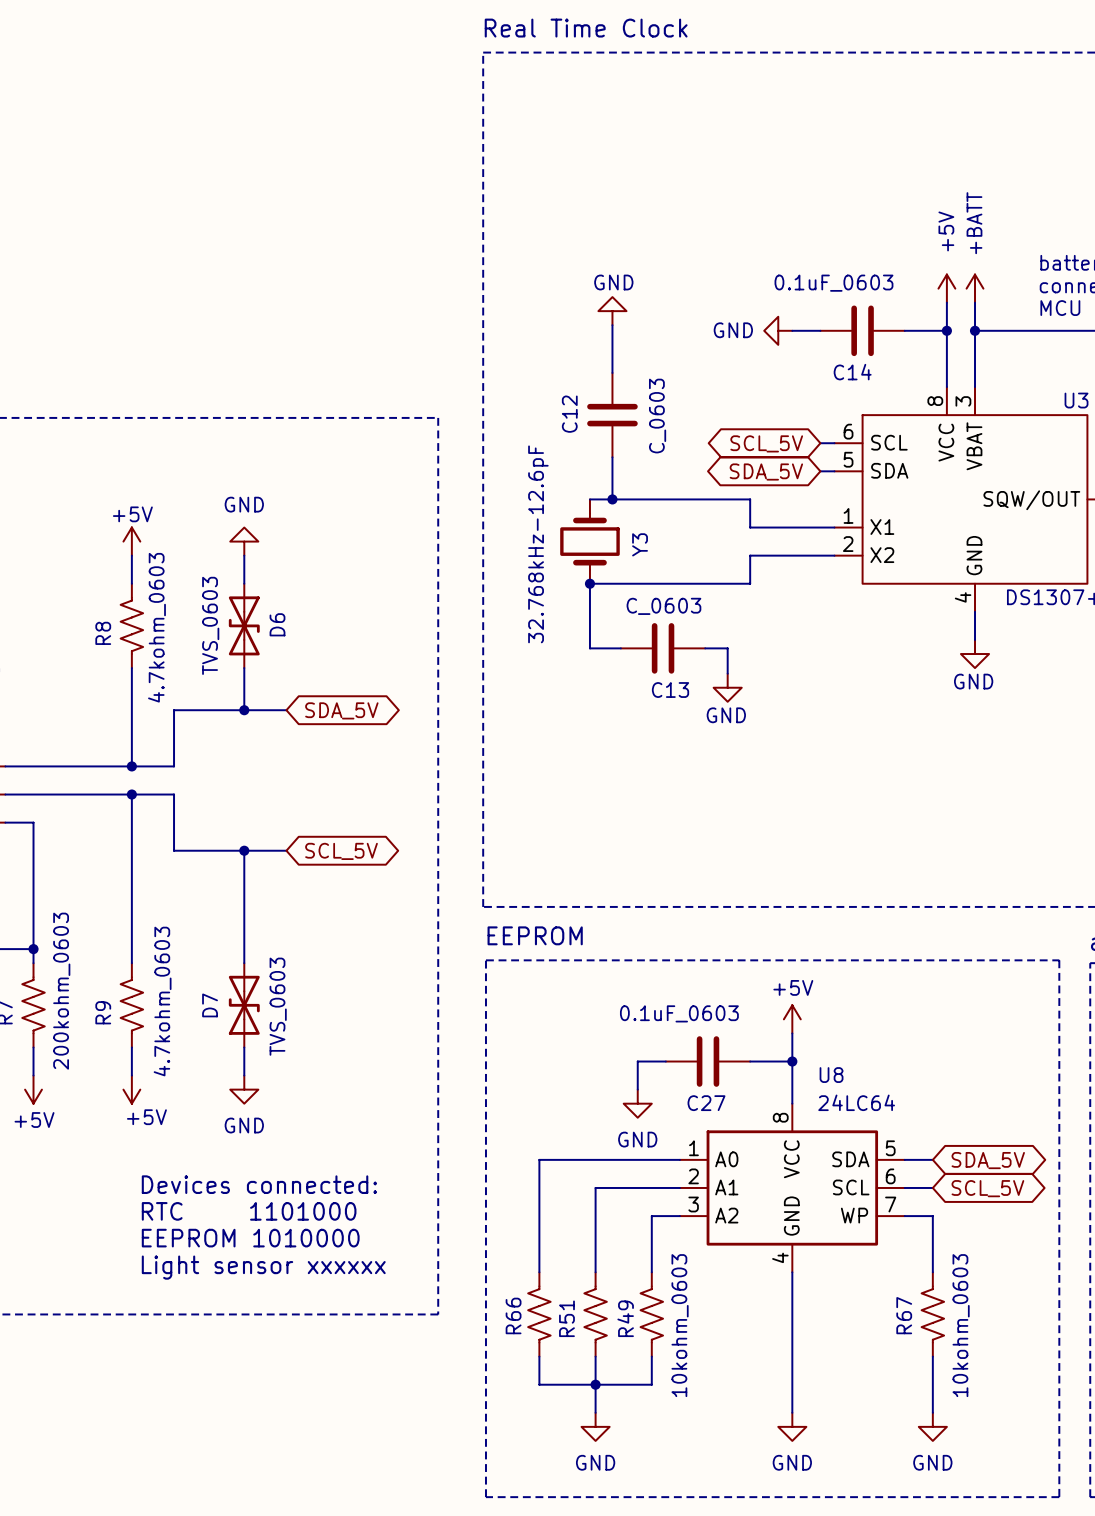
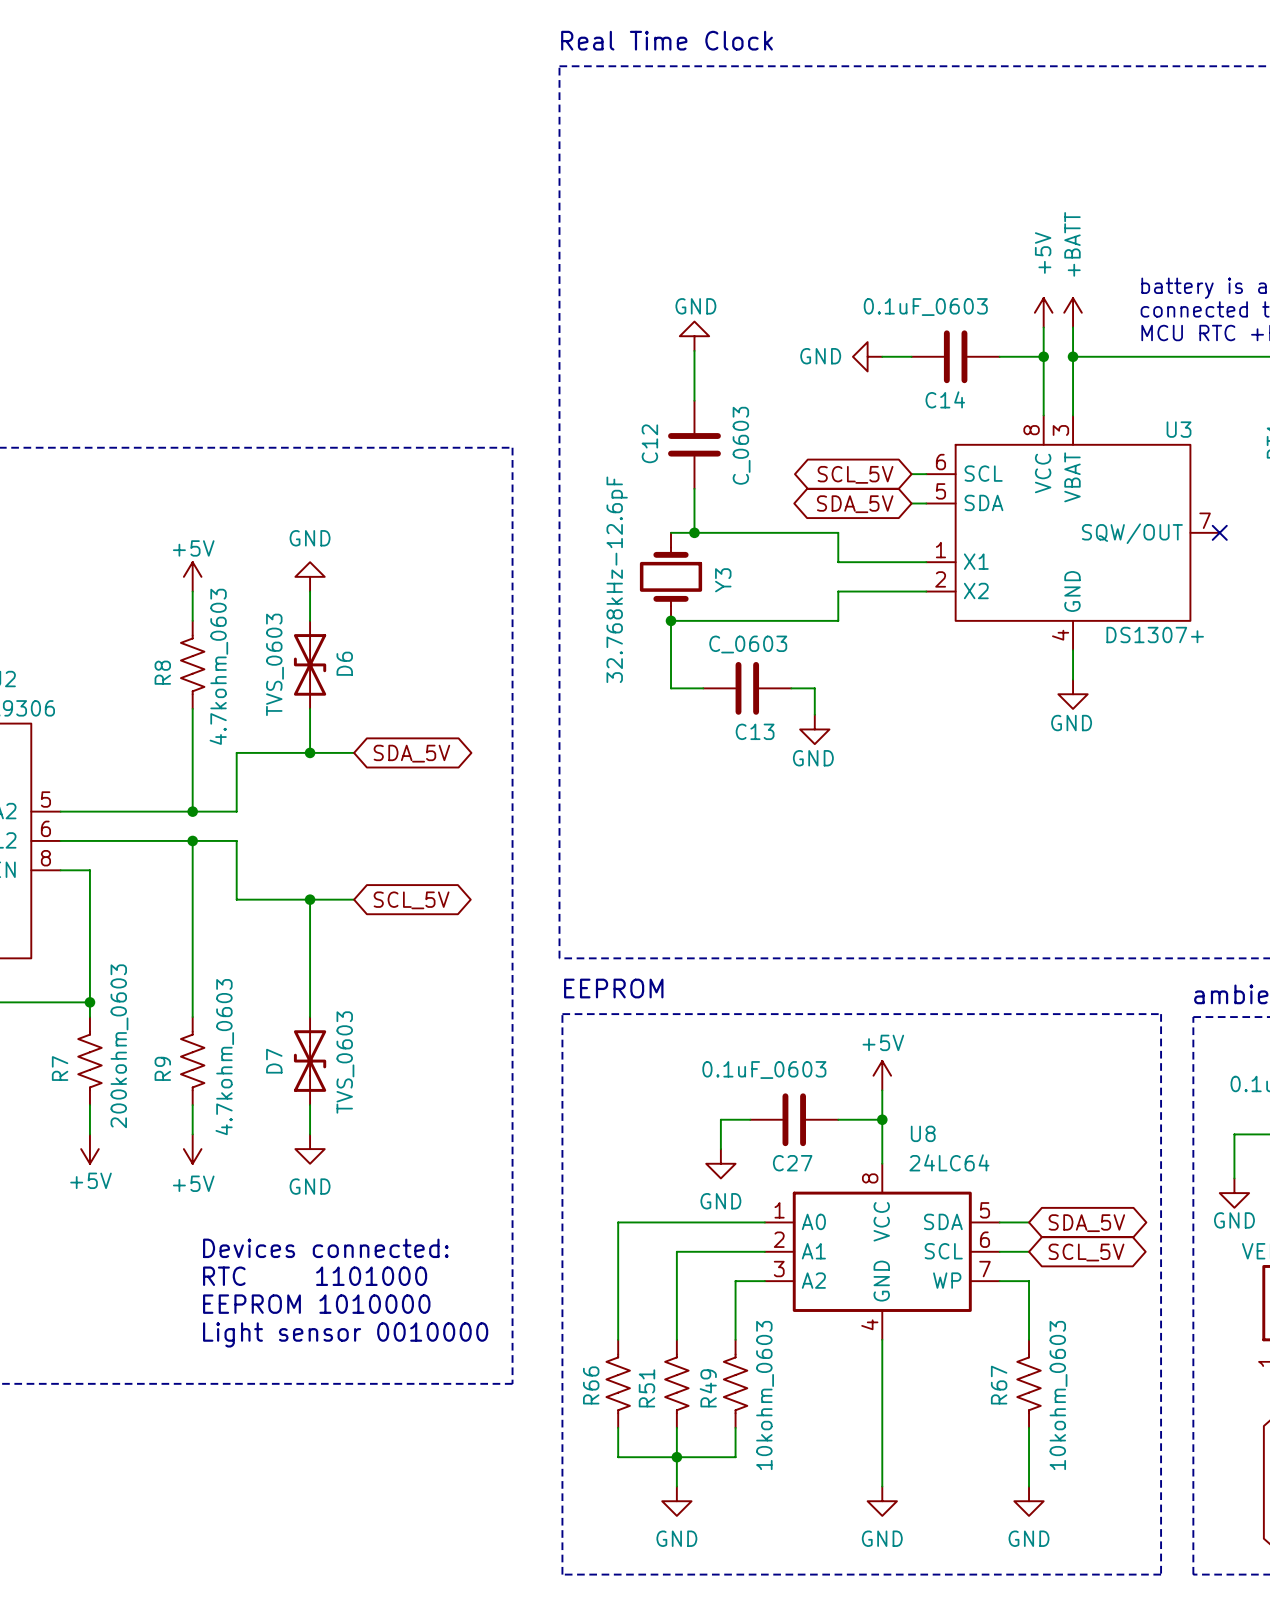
power symbol text position: +5V (146, 1117) -> +5V (193, 1183)
text: Light sensor xxxxxx (263, 1267) -> Light sensor 0010000 (345, 1334)

